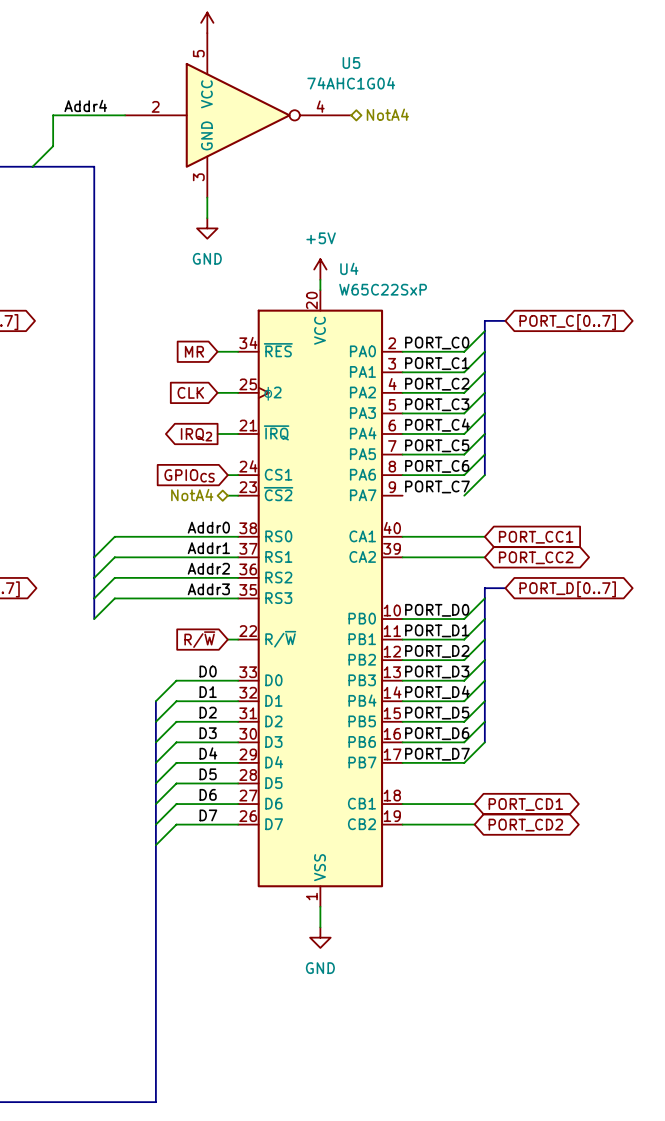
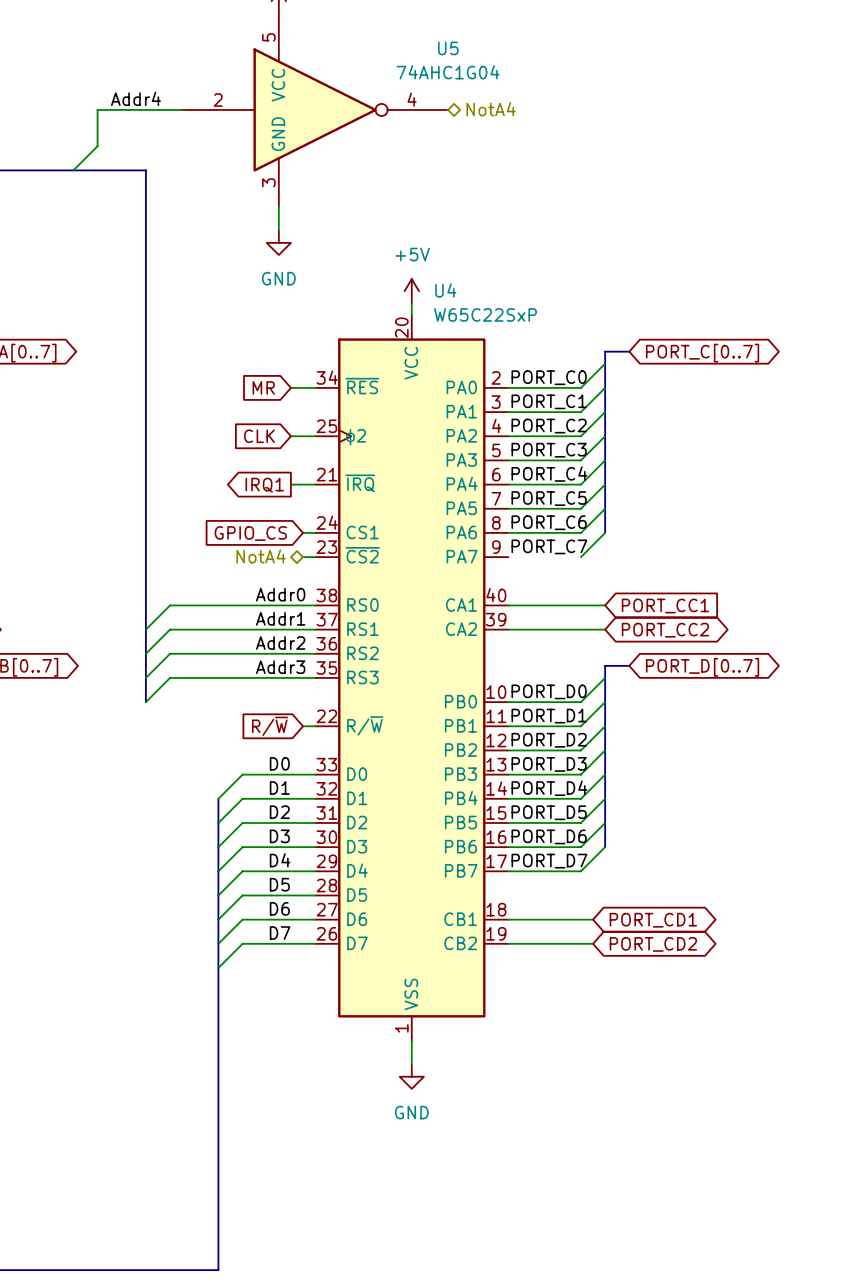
global label: IRQ2 (196, 434) -> IRQ1 (264, 485)
global label: GPIOCS (189, 475) -> GPIO_CS (250, 533)

